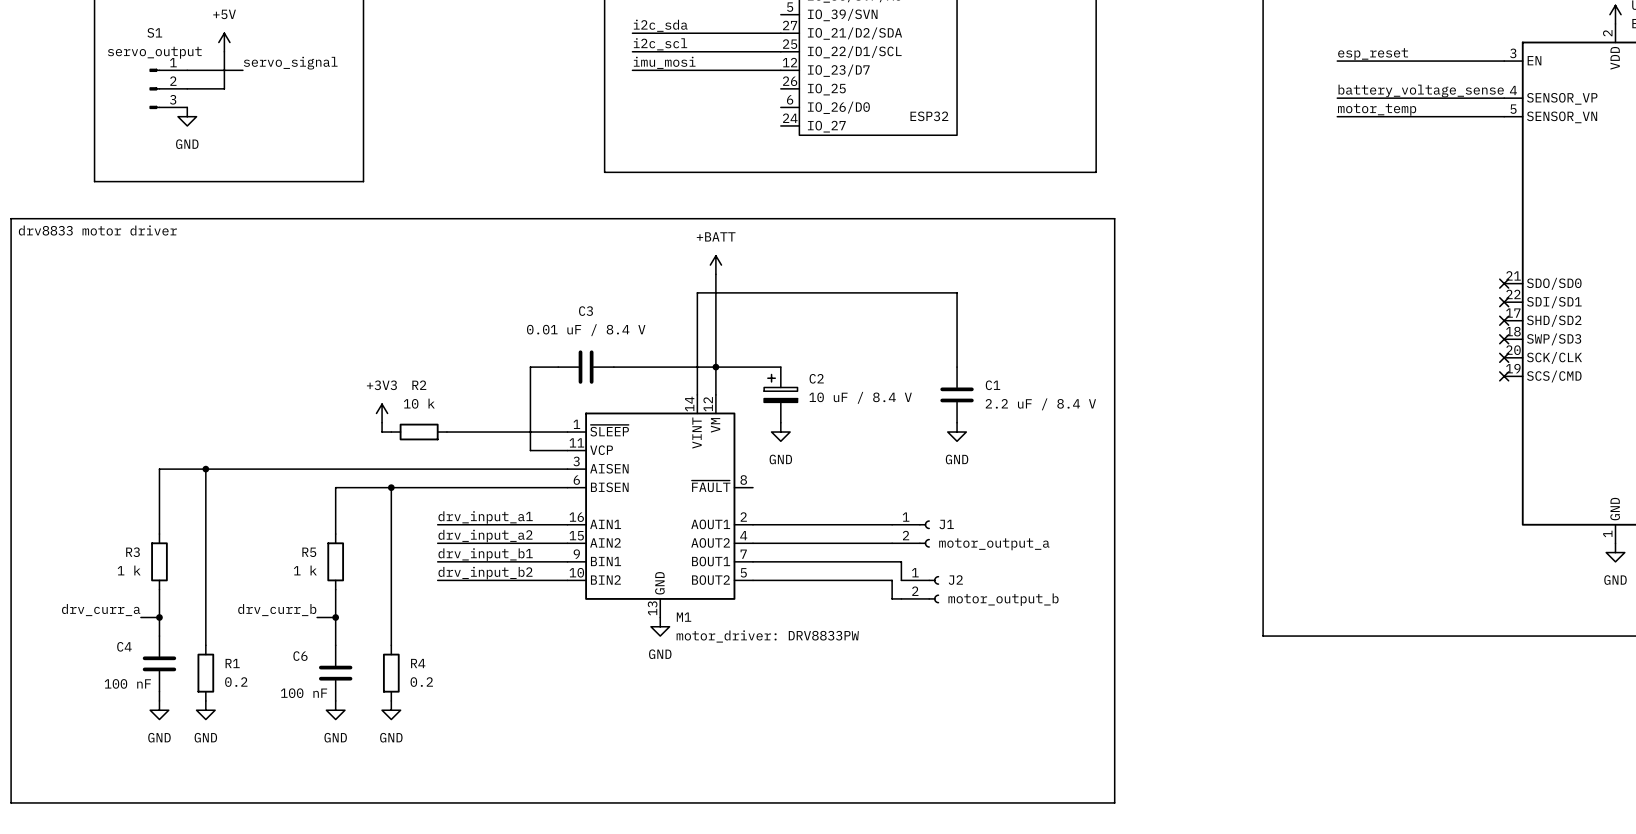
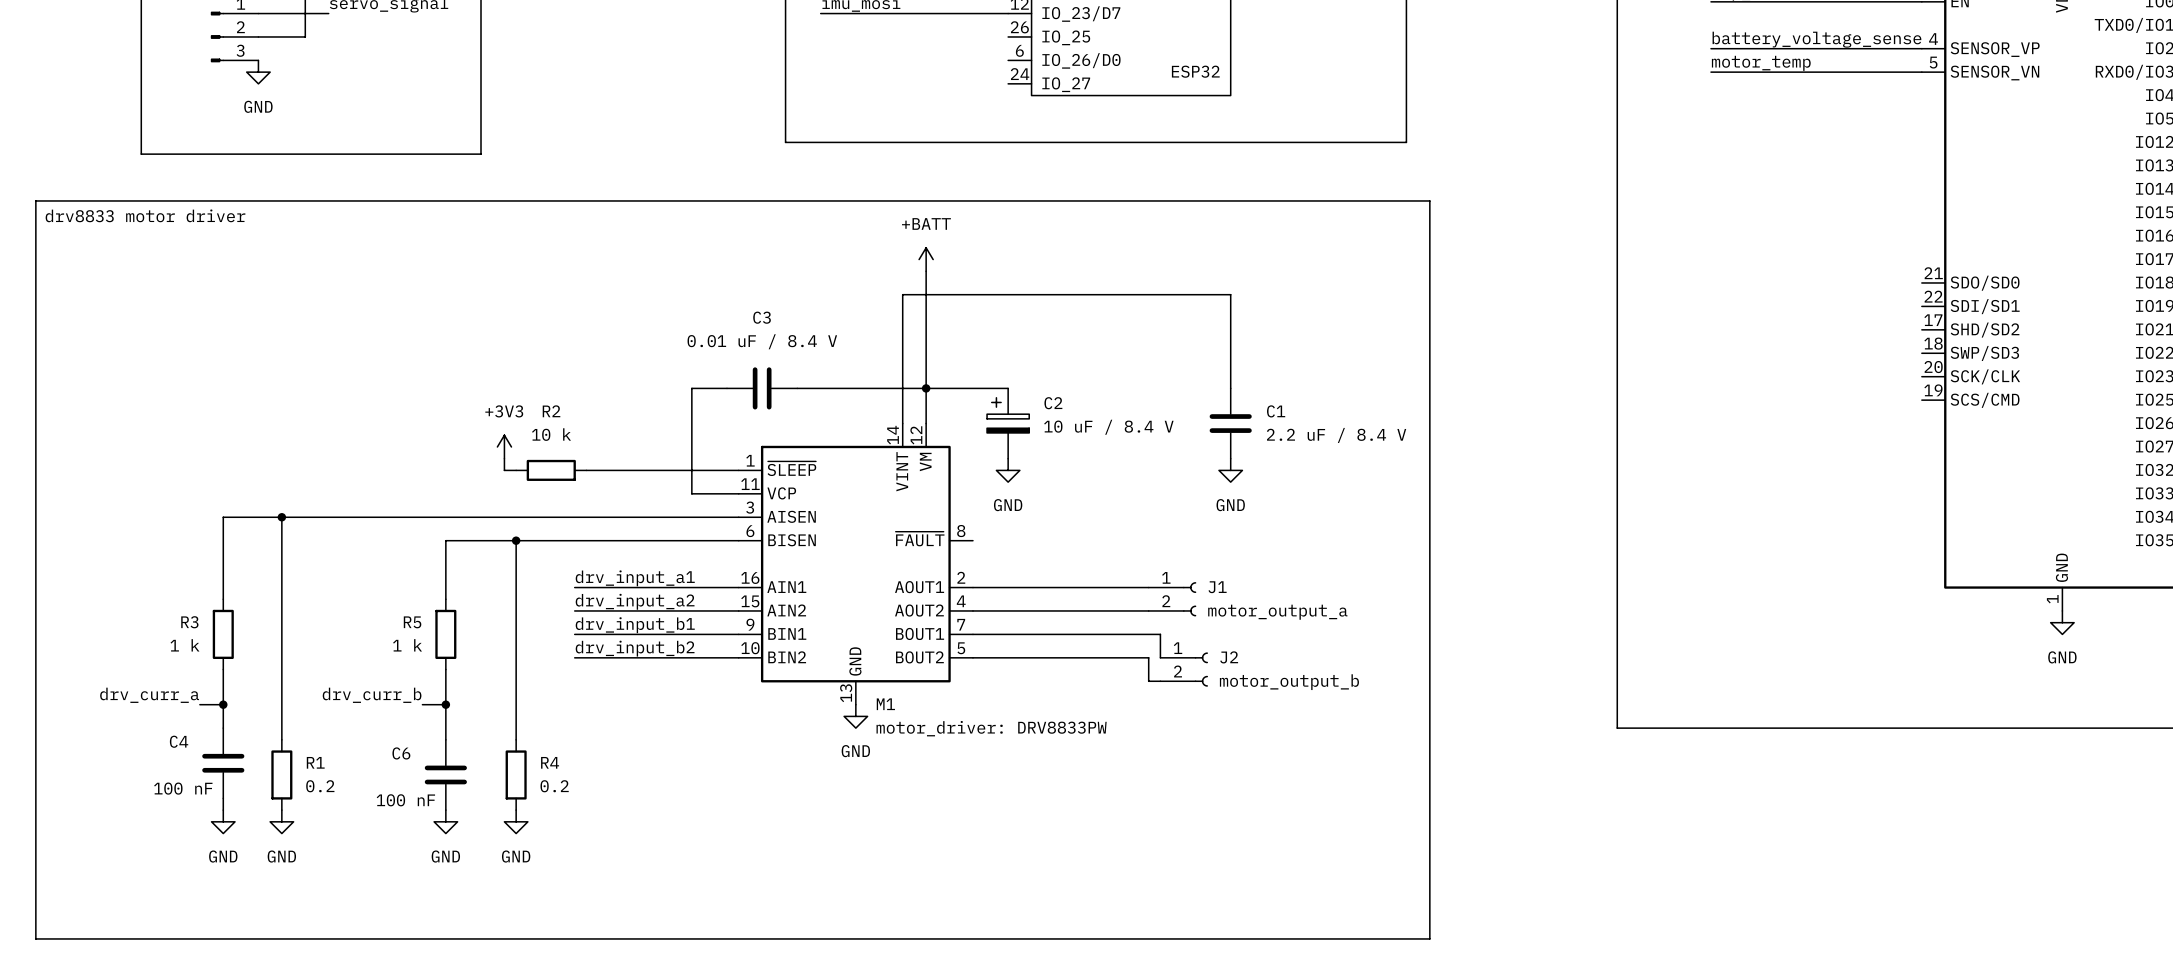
no-connect mark: (1504, 283) -> none
no-connect mark: (1504, 302) -> none
no-connect mark: (1504, 320) -> none
no-connect mark: (1504, 339) -> none
no-connect mark: (1504, 357) -> none
no-connect mark: (1504, 376) -> none

